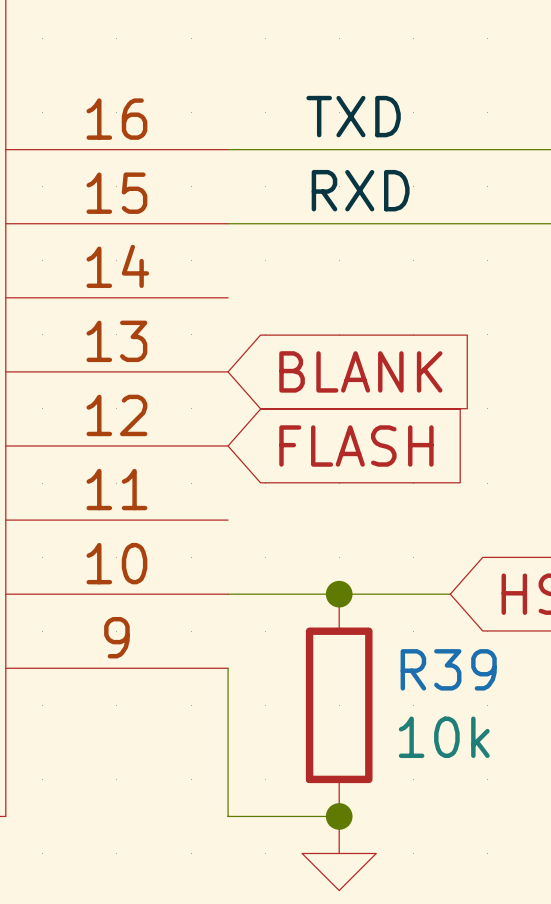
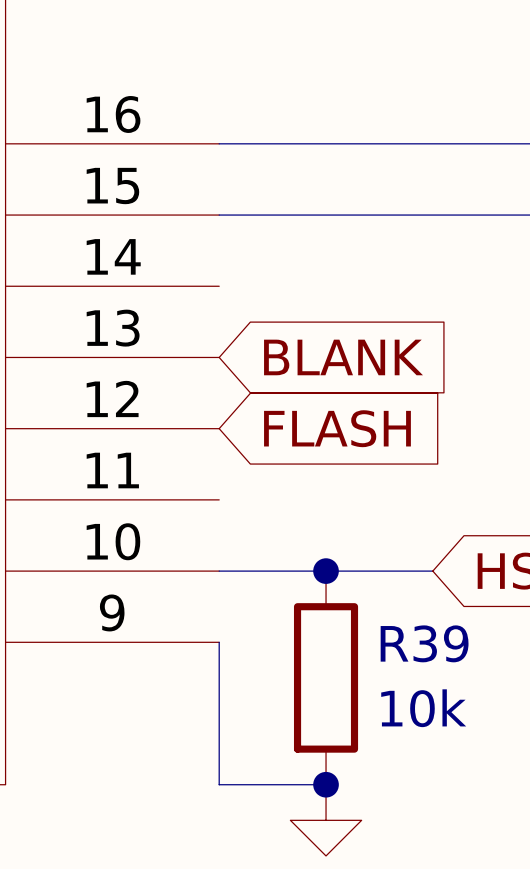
label: TXD (353, 116) -> none
label: RXD (360, 190) -> none

